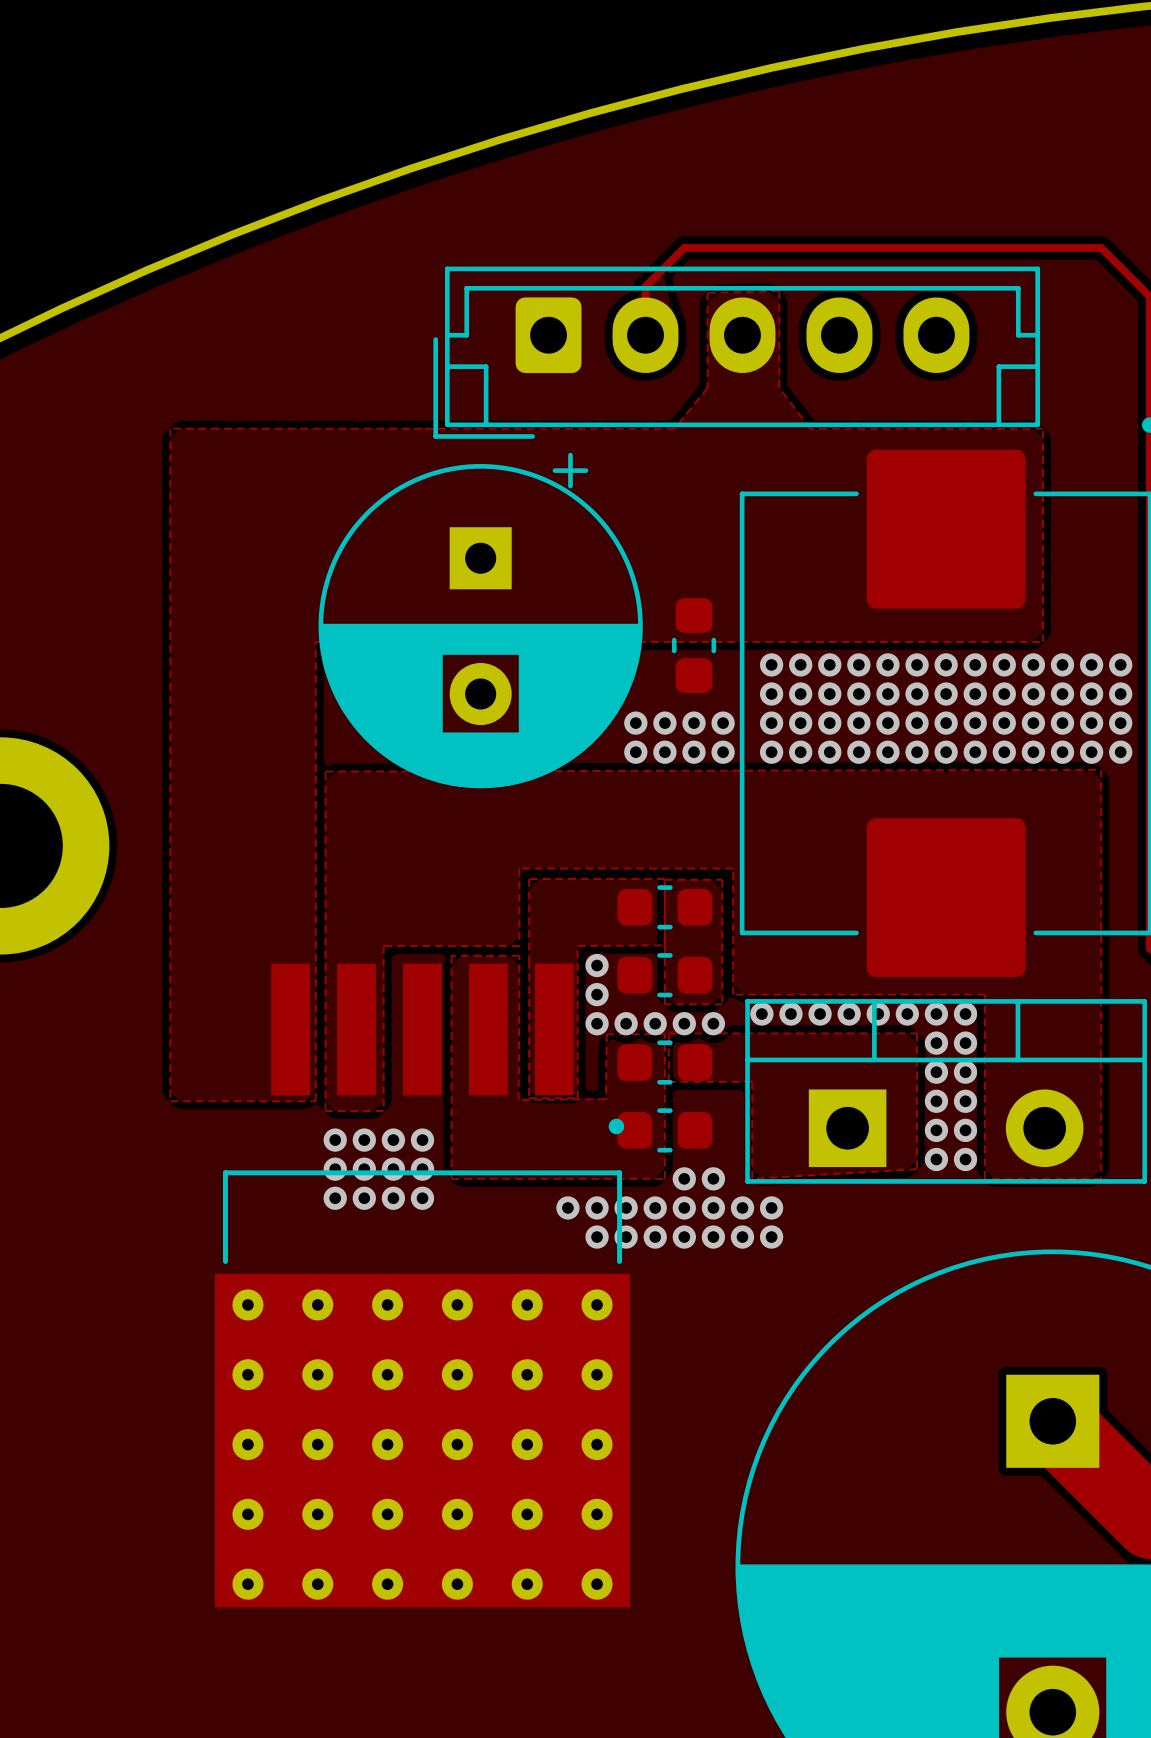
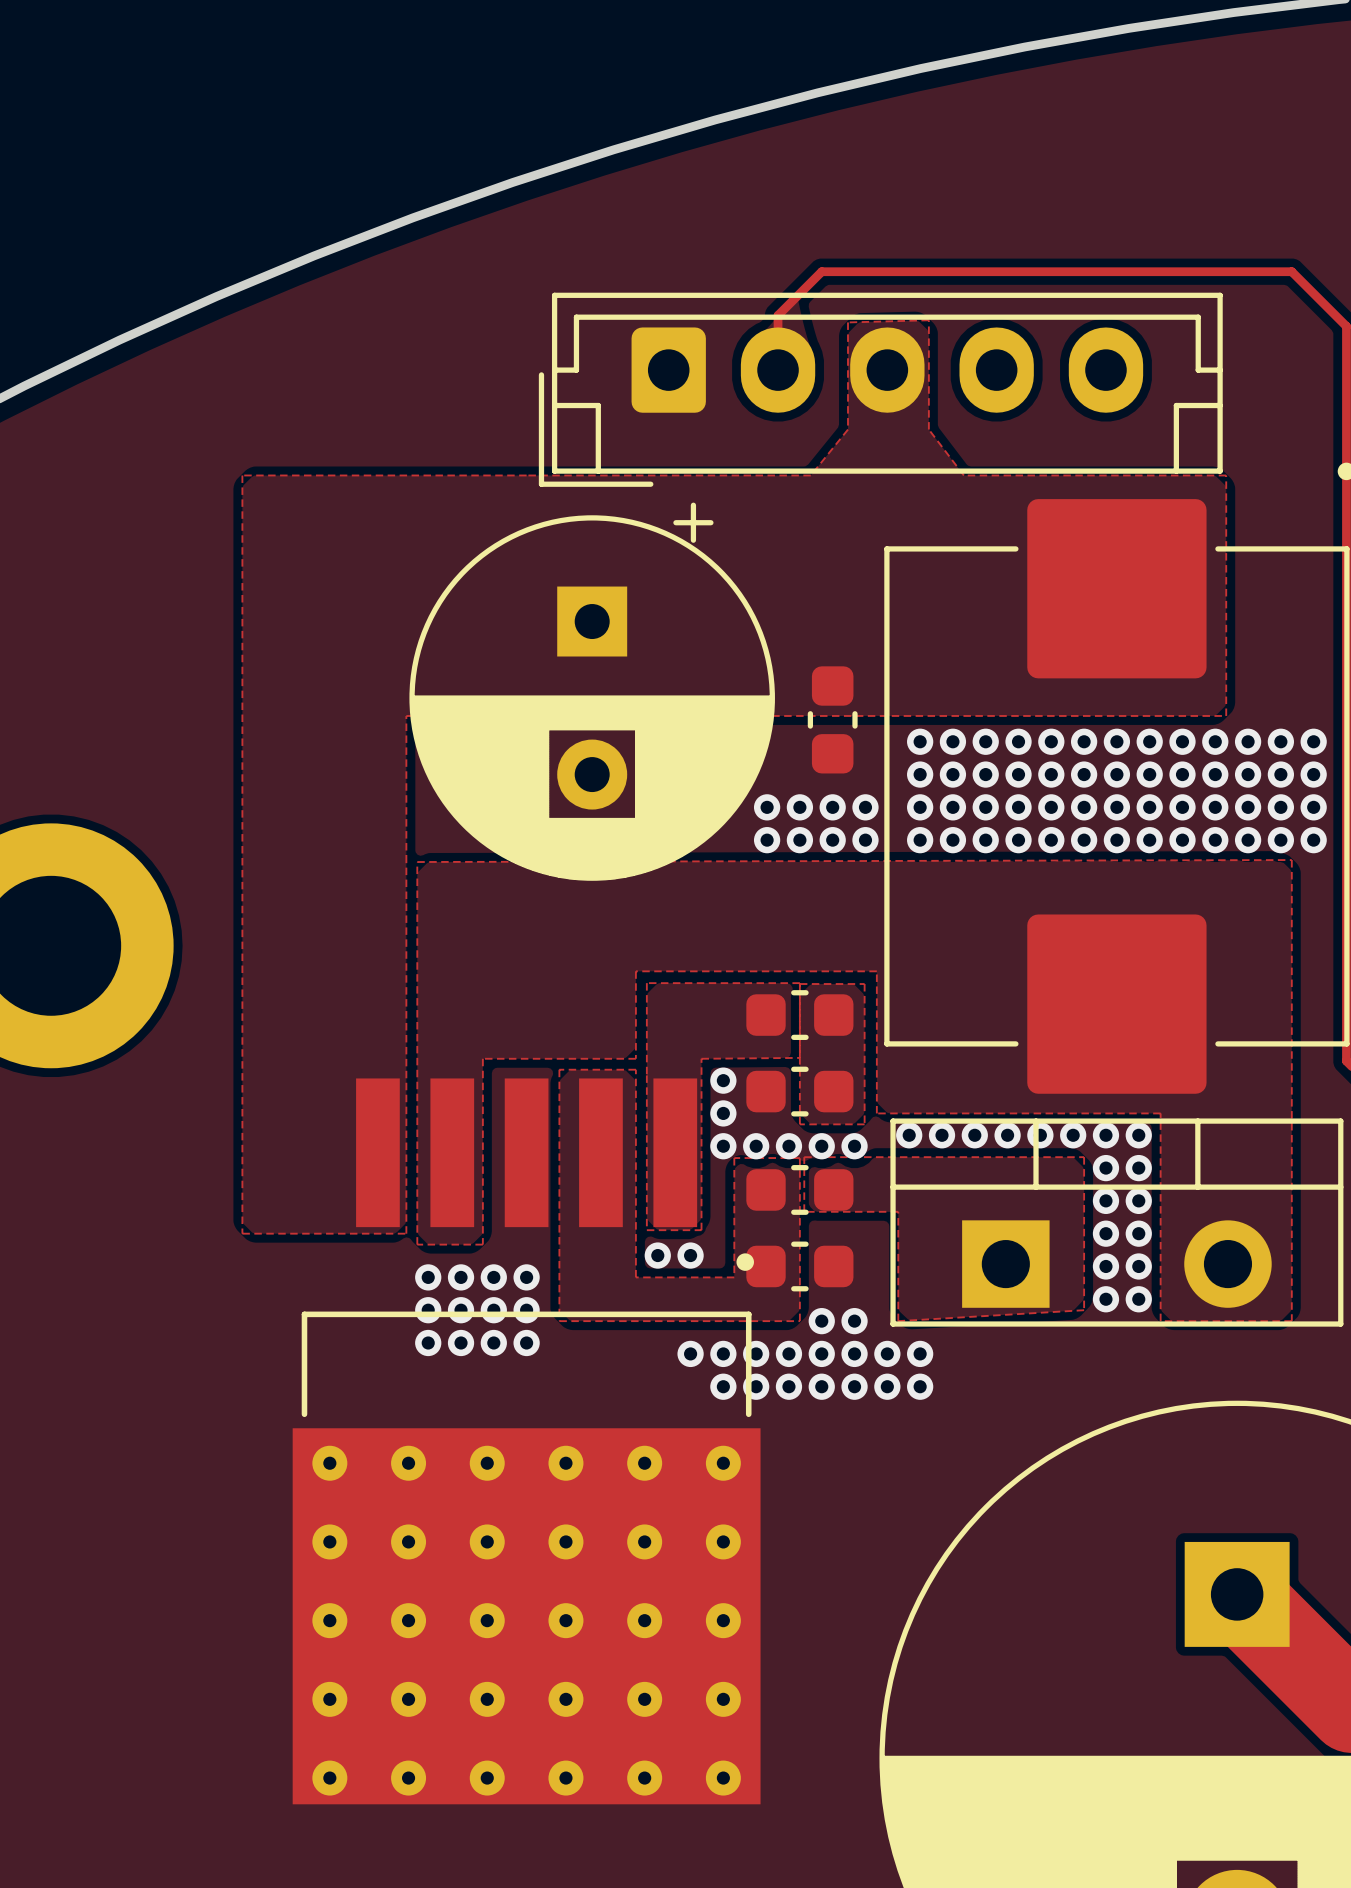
zone outline: (519, 955) (518, 1099) (605, 1099) (606, 1034) -> (635, 1069) (635, 1277) (734, 1277) (734, 1158)
via: none -> (657, 1255)
via: none -> (690, 1255)

